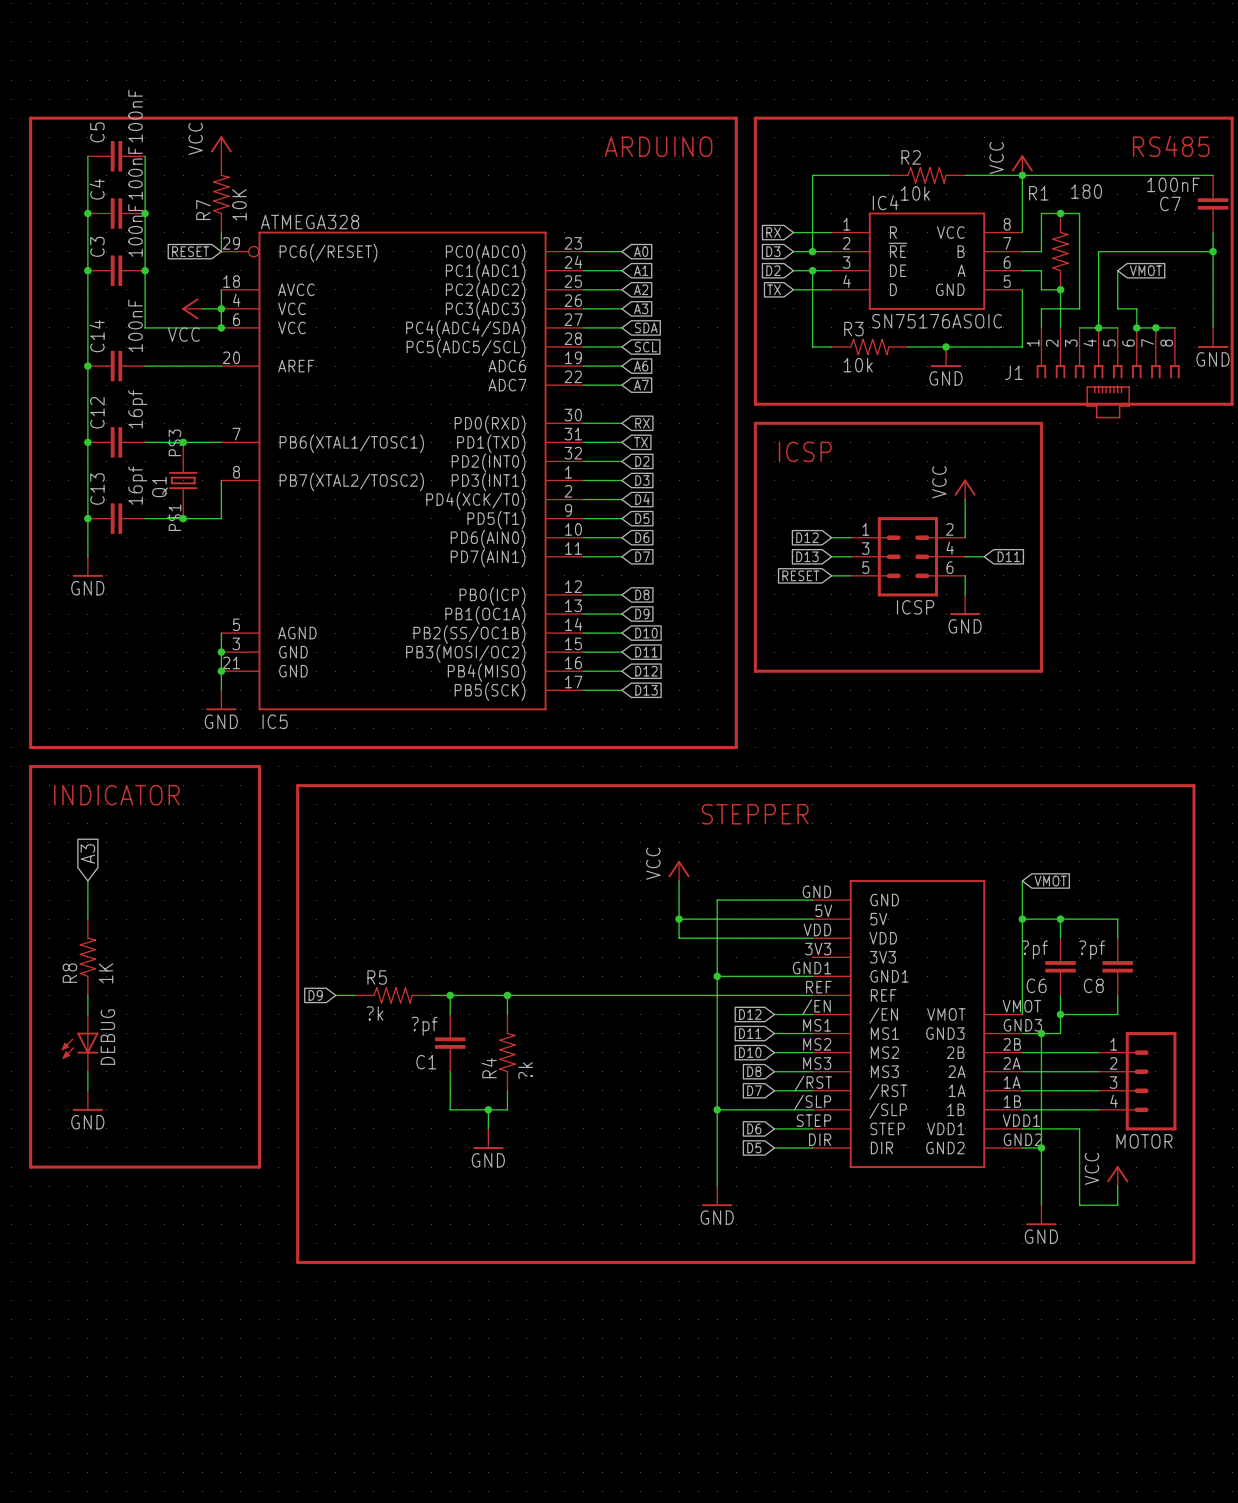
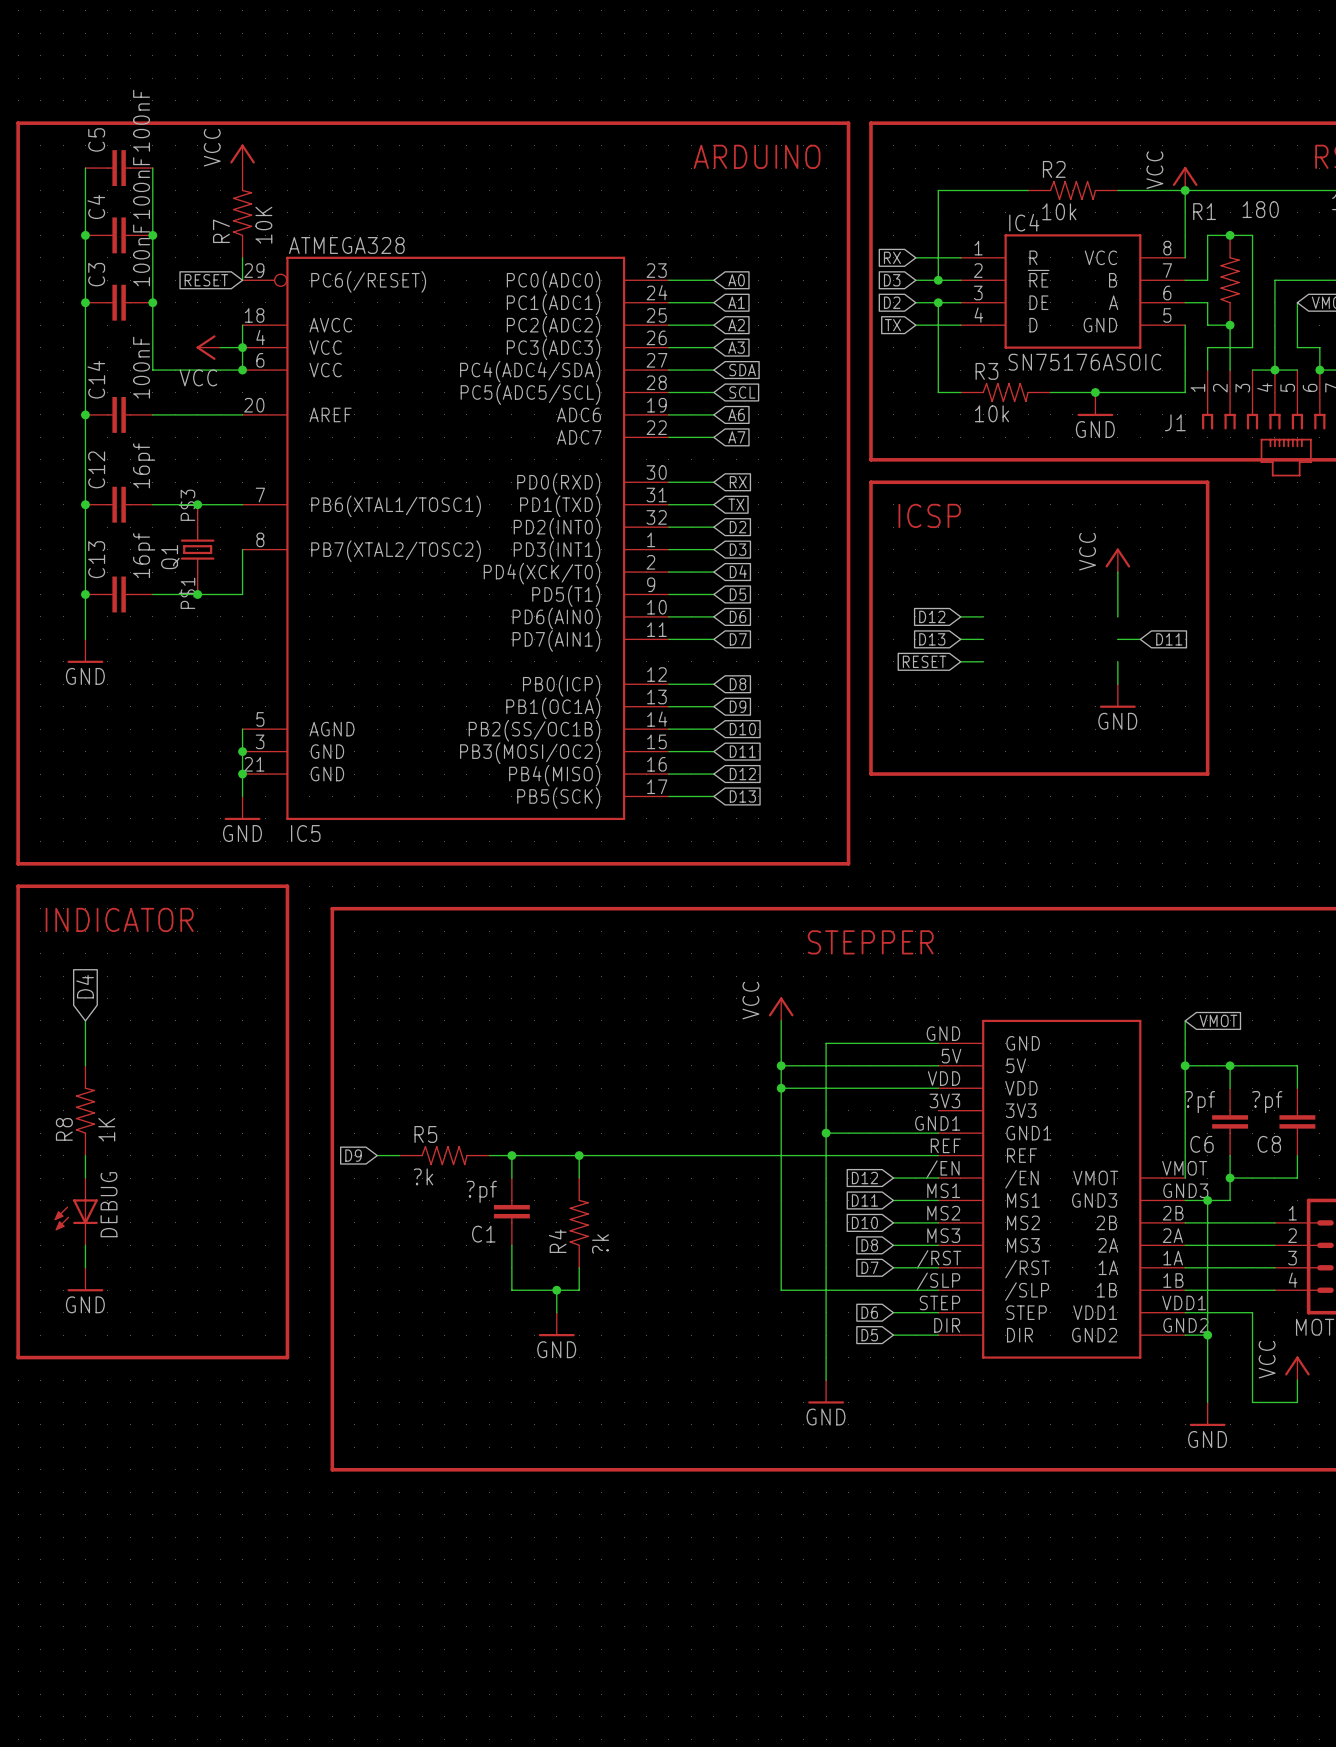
ICSP: (907, 556) -> none
global label: A3 (87, 853) -> D4 (85, 986)
wire: none -> (781, 1088) (781, 1290) (826, 1290)
junction: none -> (781, 1088)
junction: (717, 1109) -> none

